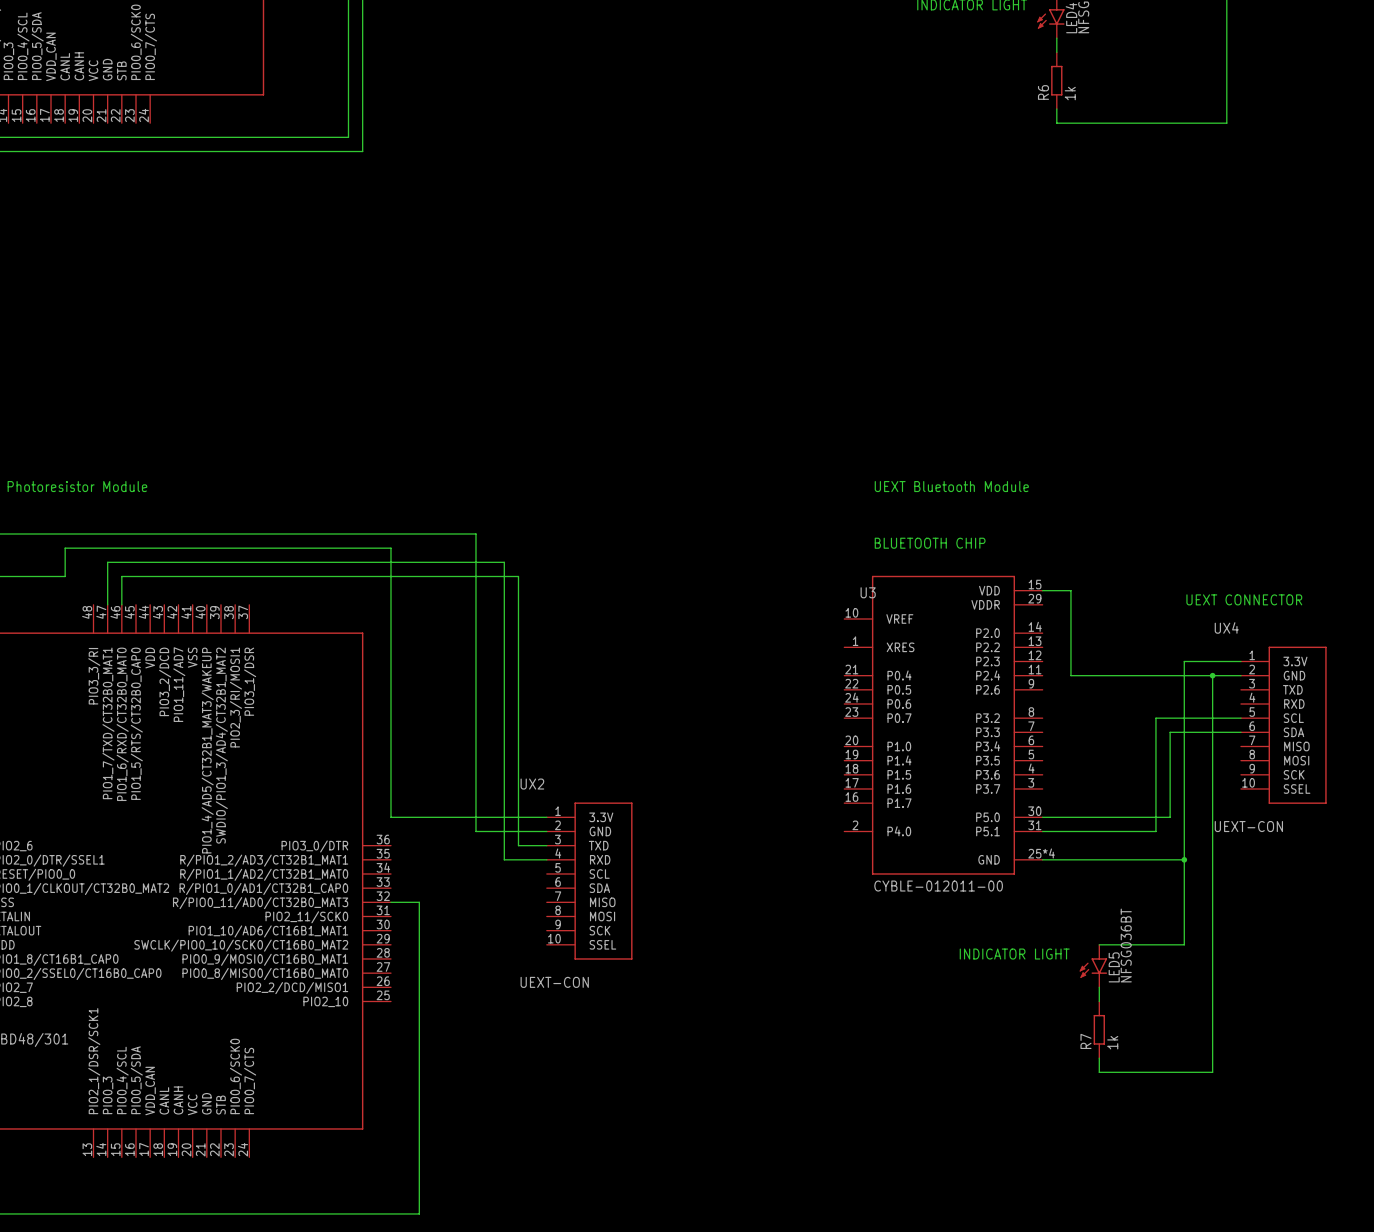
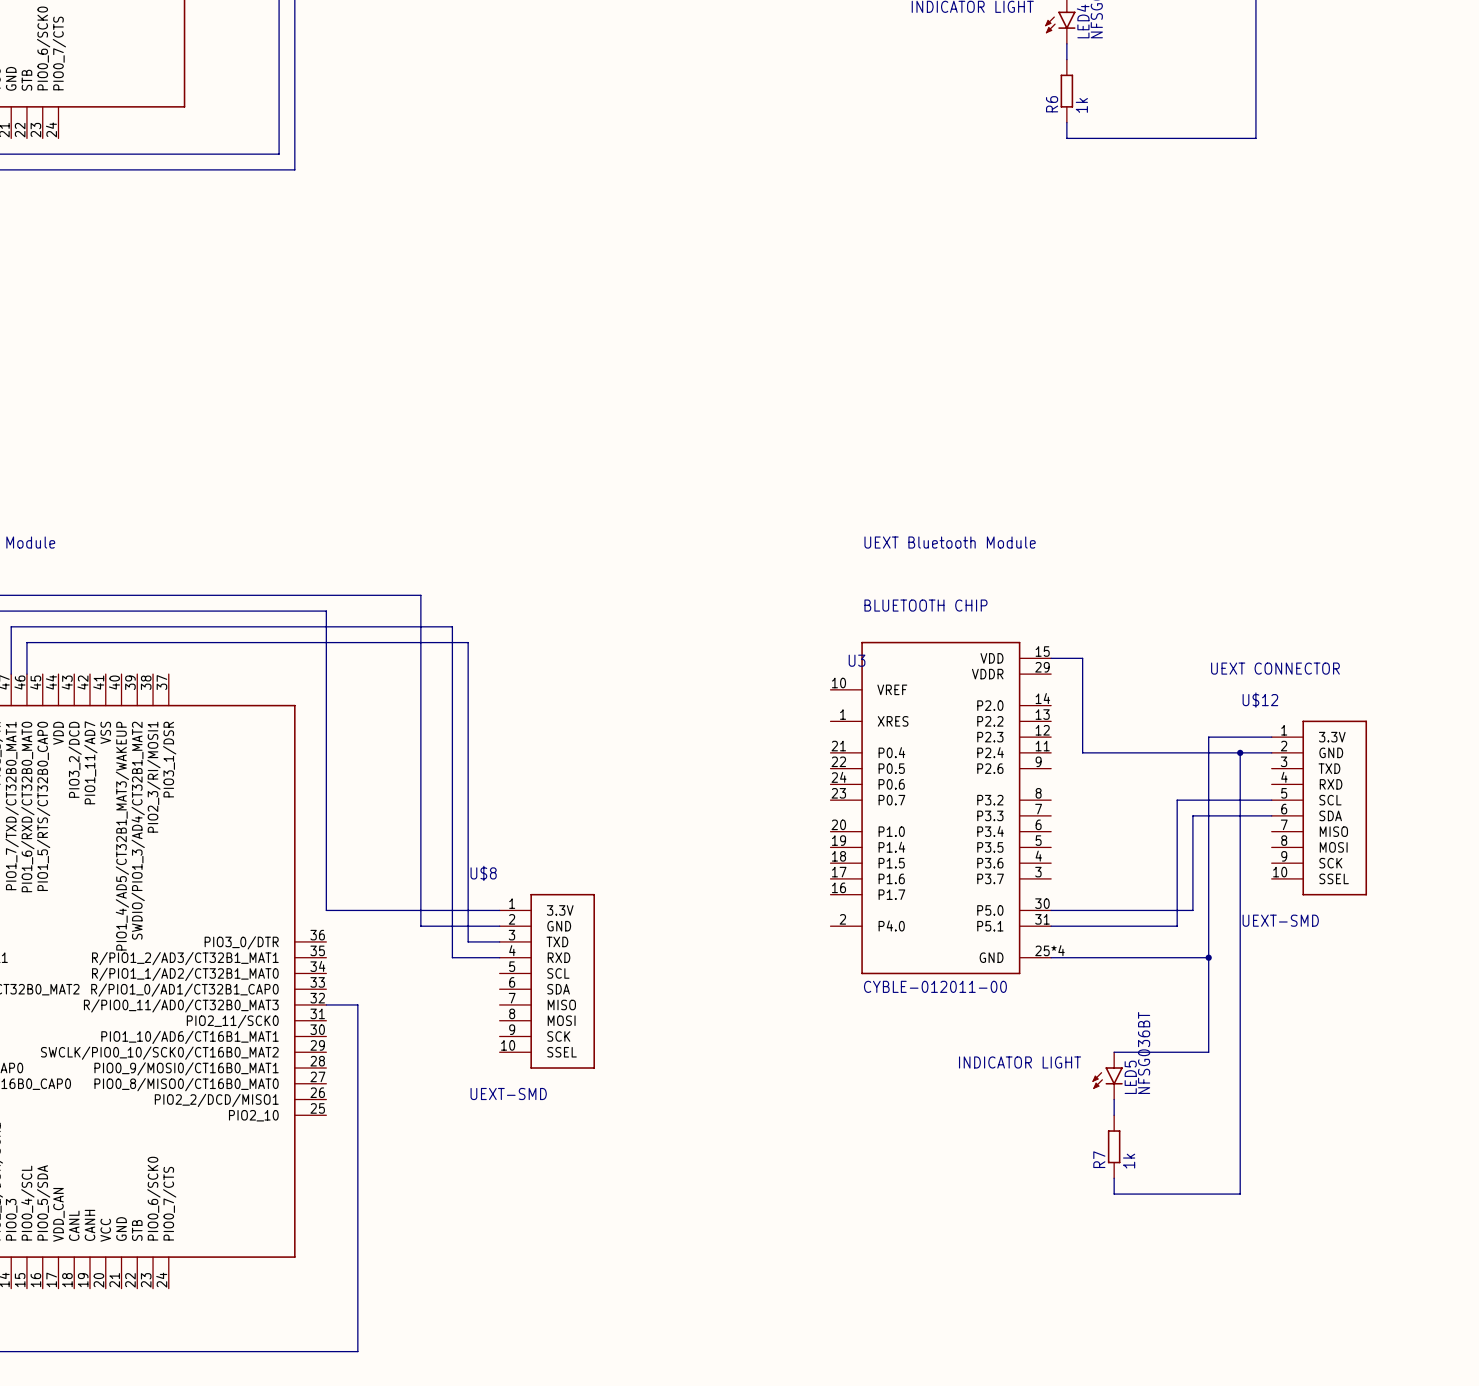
UX4 name: UX4 (1226, 627) -> U$12 (1260, 700)
UX2 name: UX2 (532, 784) -> U$8 (483, 873)
UX4 value: UEXT-CON (1248, 826) -> UEXT-SMD (1280, 920)
UX2 value: UEXT-CON (554, 982) -> UEXT-SMD (508, 1094)

